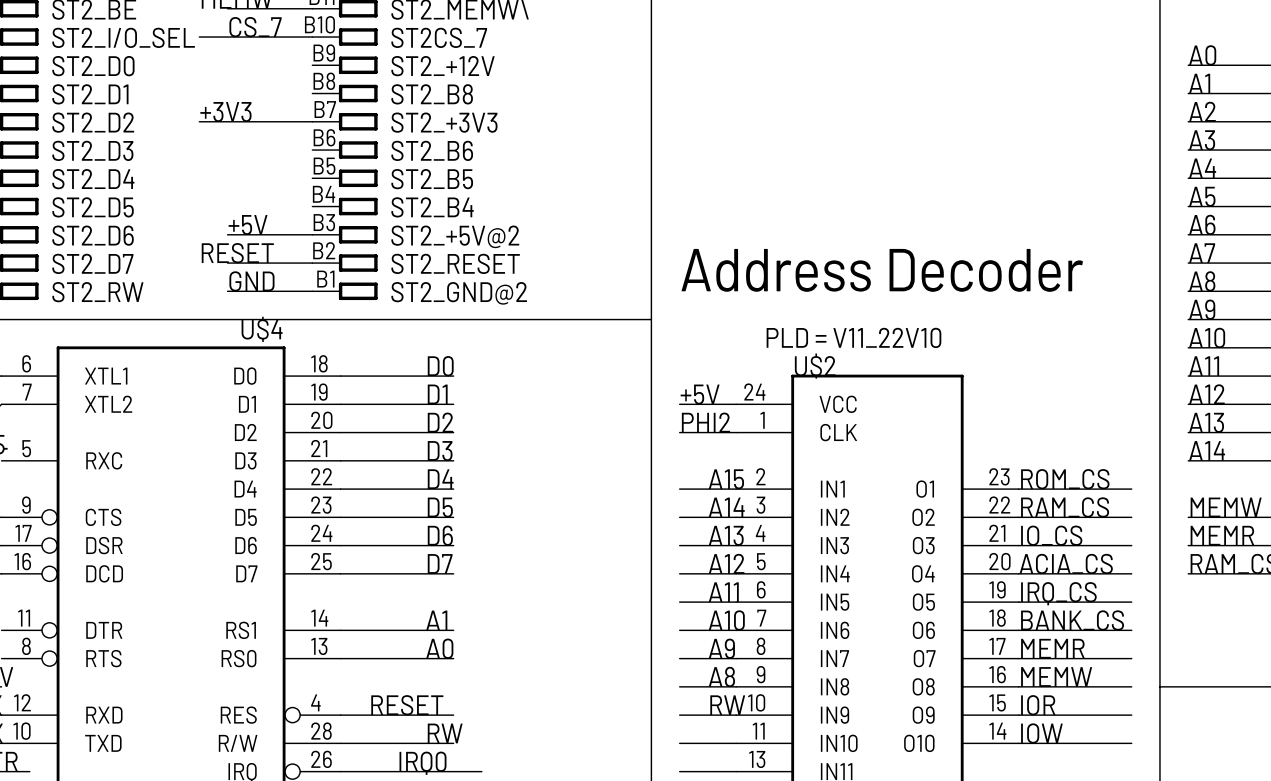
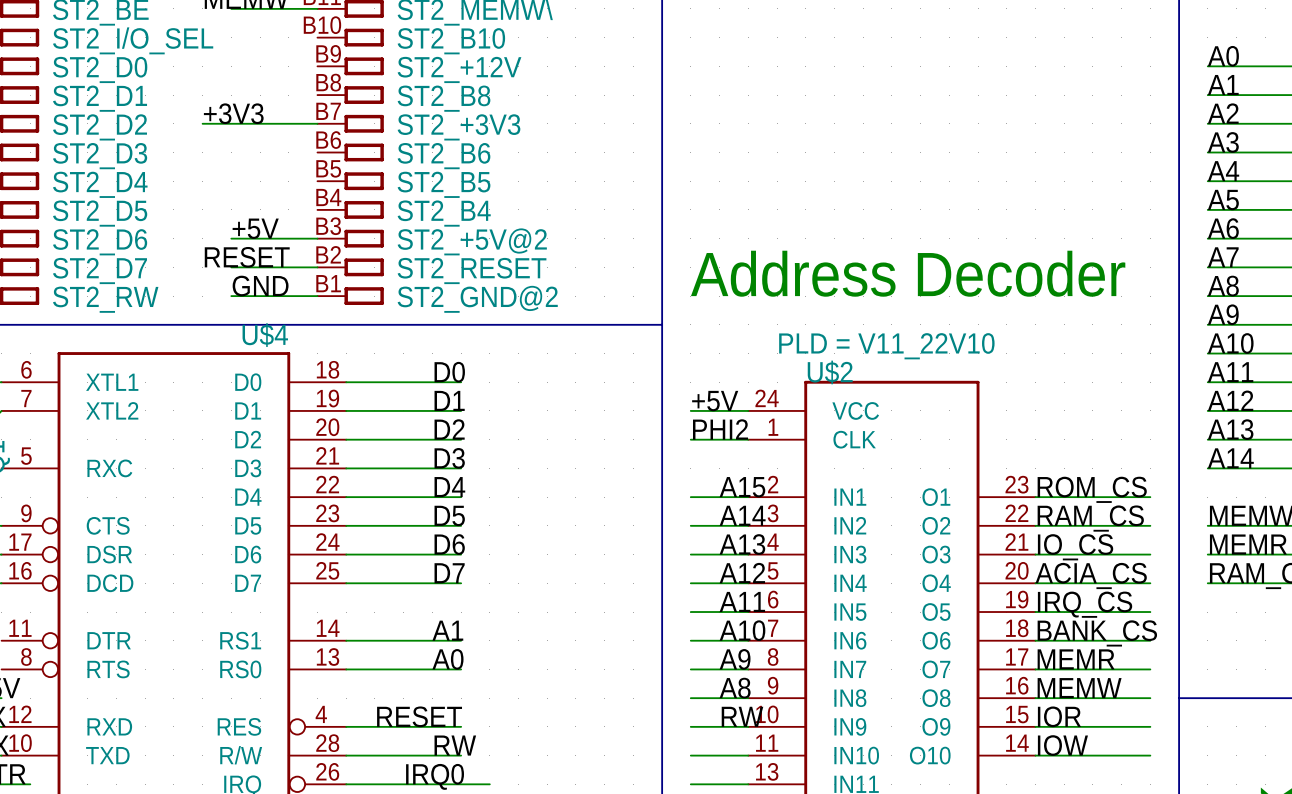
label: CS_7 (255, 27) -> none
wire: (199, 37) (312, 37) -> none
ST2CS_7 name: ST2CS_7 (439, 37) -> ST2_B10 (451, 41)

